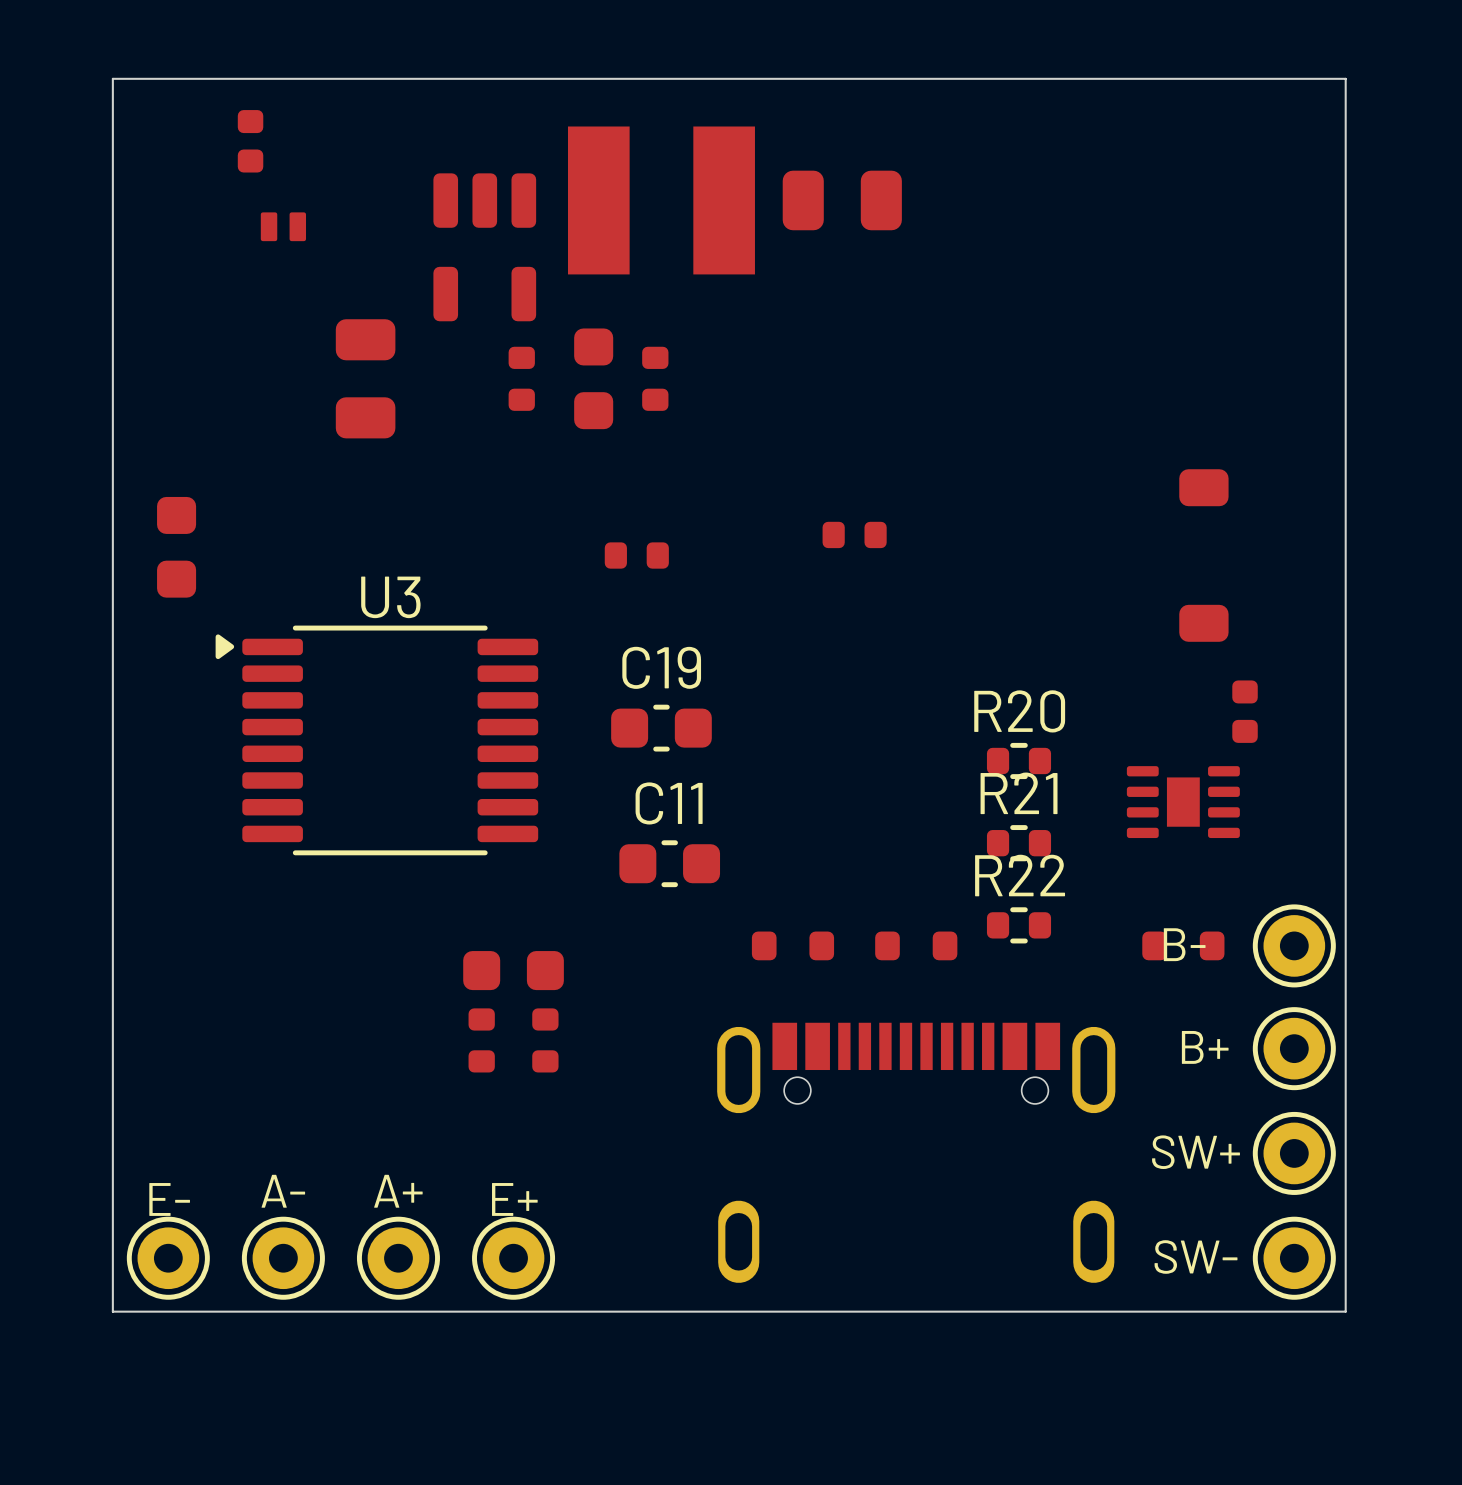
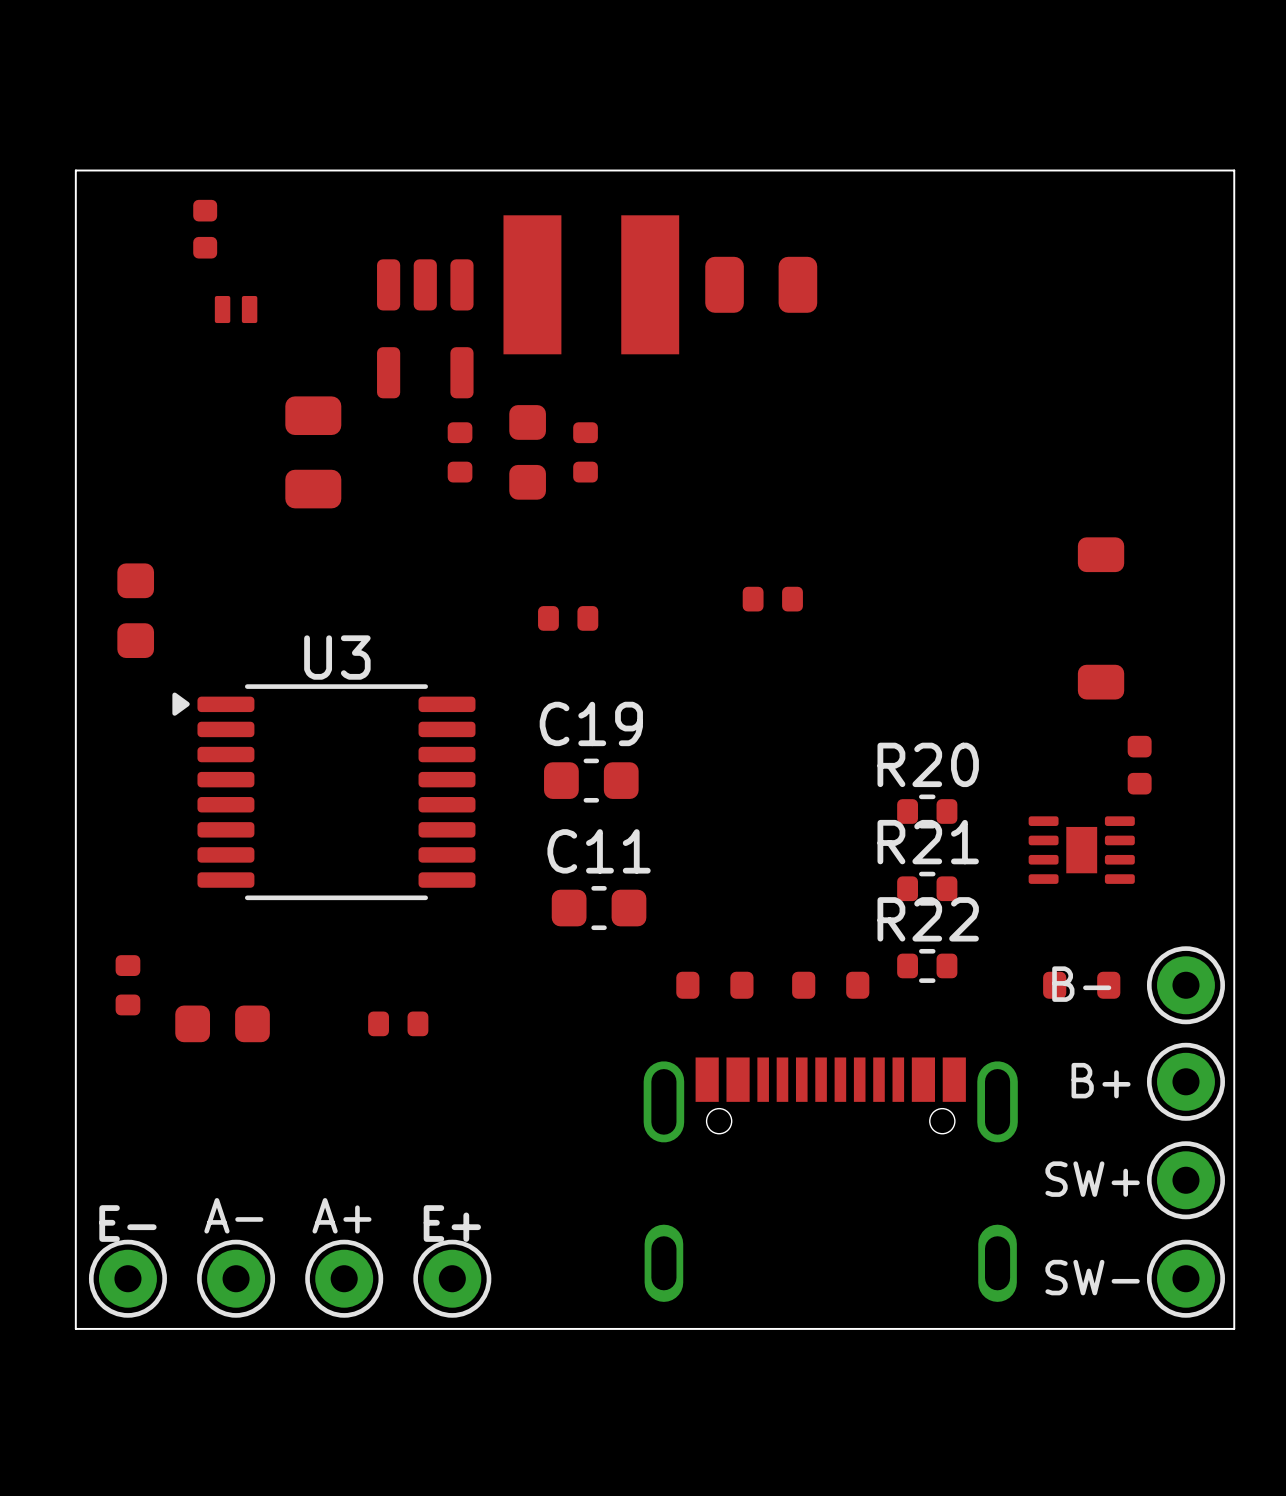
part: none -> (127, 985)
part position: (513, 970) -> (222, 1023)
part: none -> (398, 1023)
part: (481, 1040) -> none
part: (545, 1040) -> none

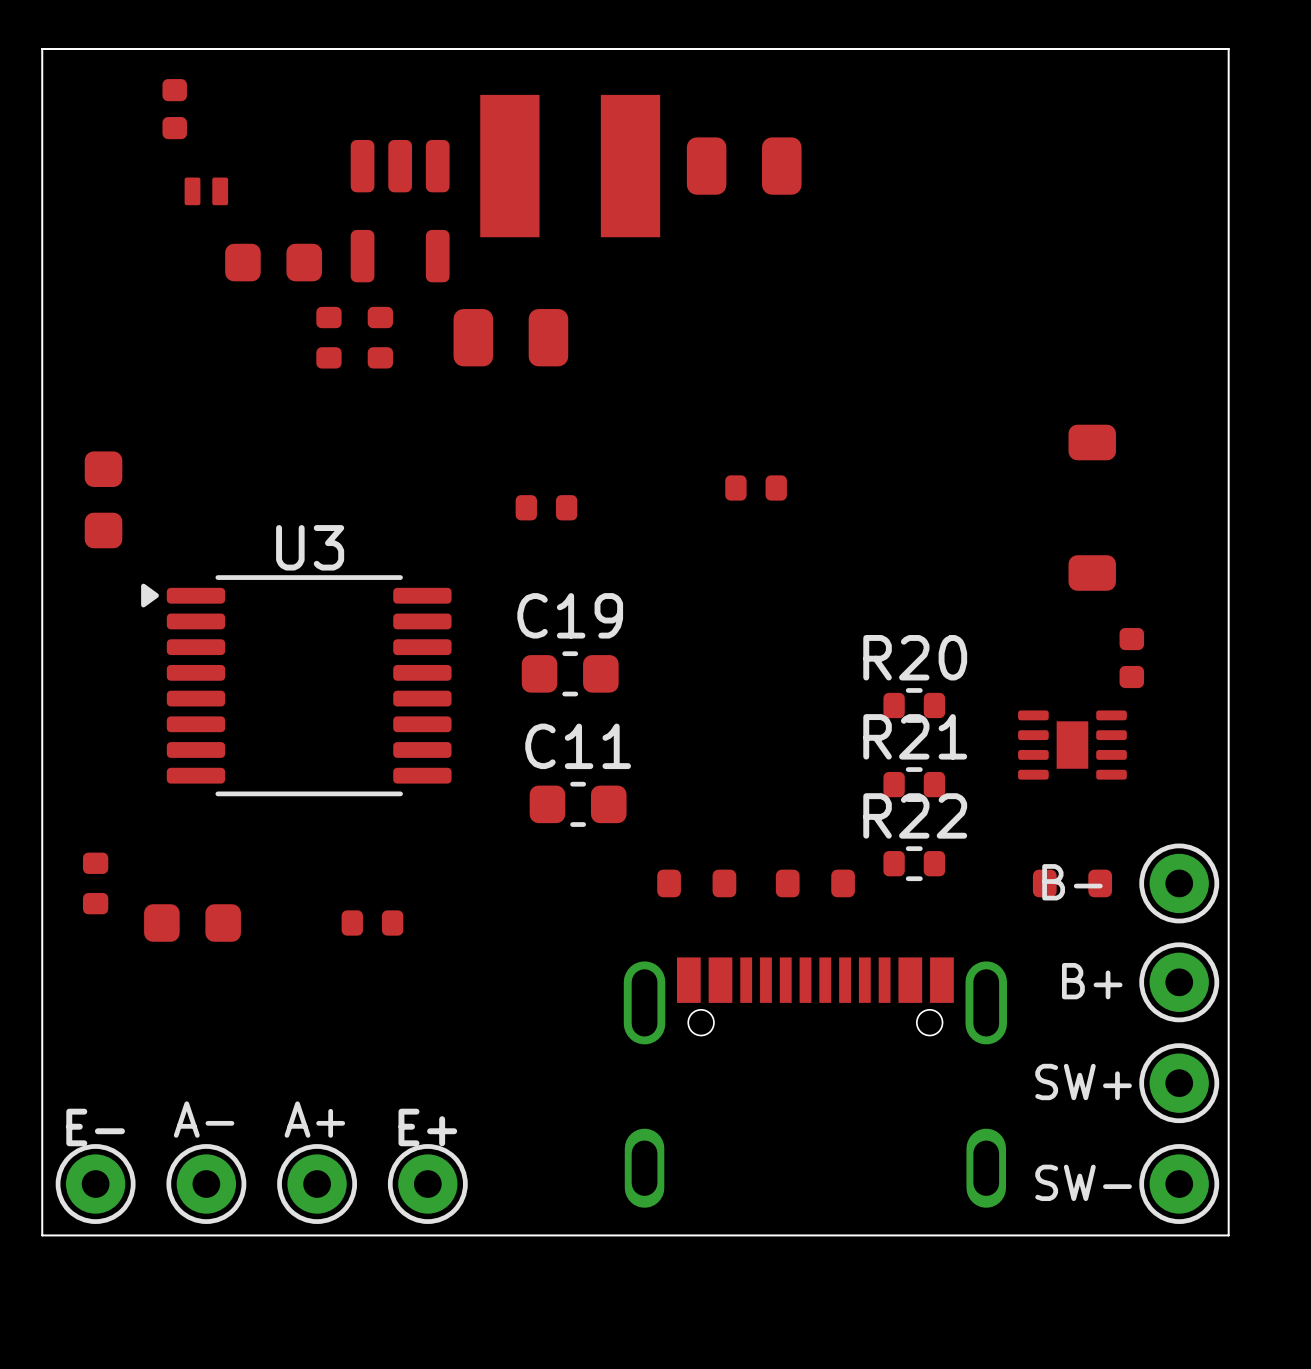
part: none -> (273, 262)
part footprint: [509, 405, 546, 500] -> [453, 309, 569, 367]
part: (313, 452) -> none
part: none -> (328, 337)
part: none -> (380, 337)
part: (460, 452) -> none
part: (585, 452) -> none

